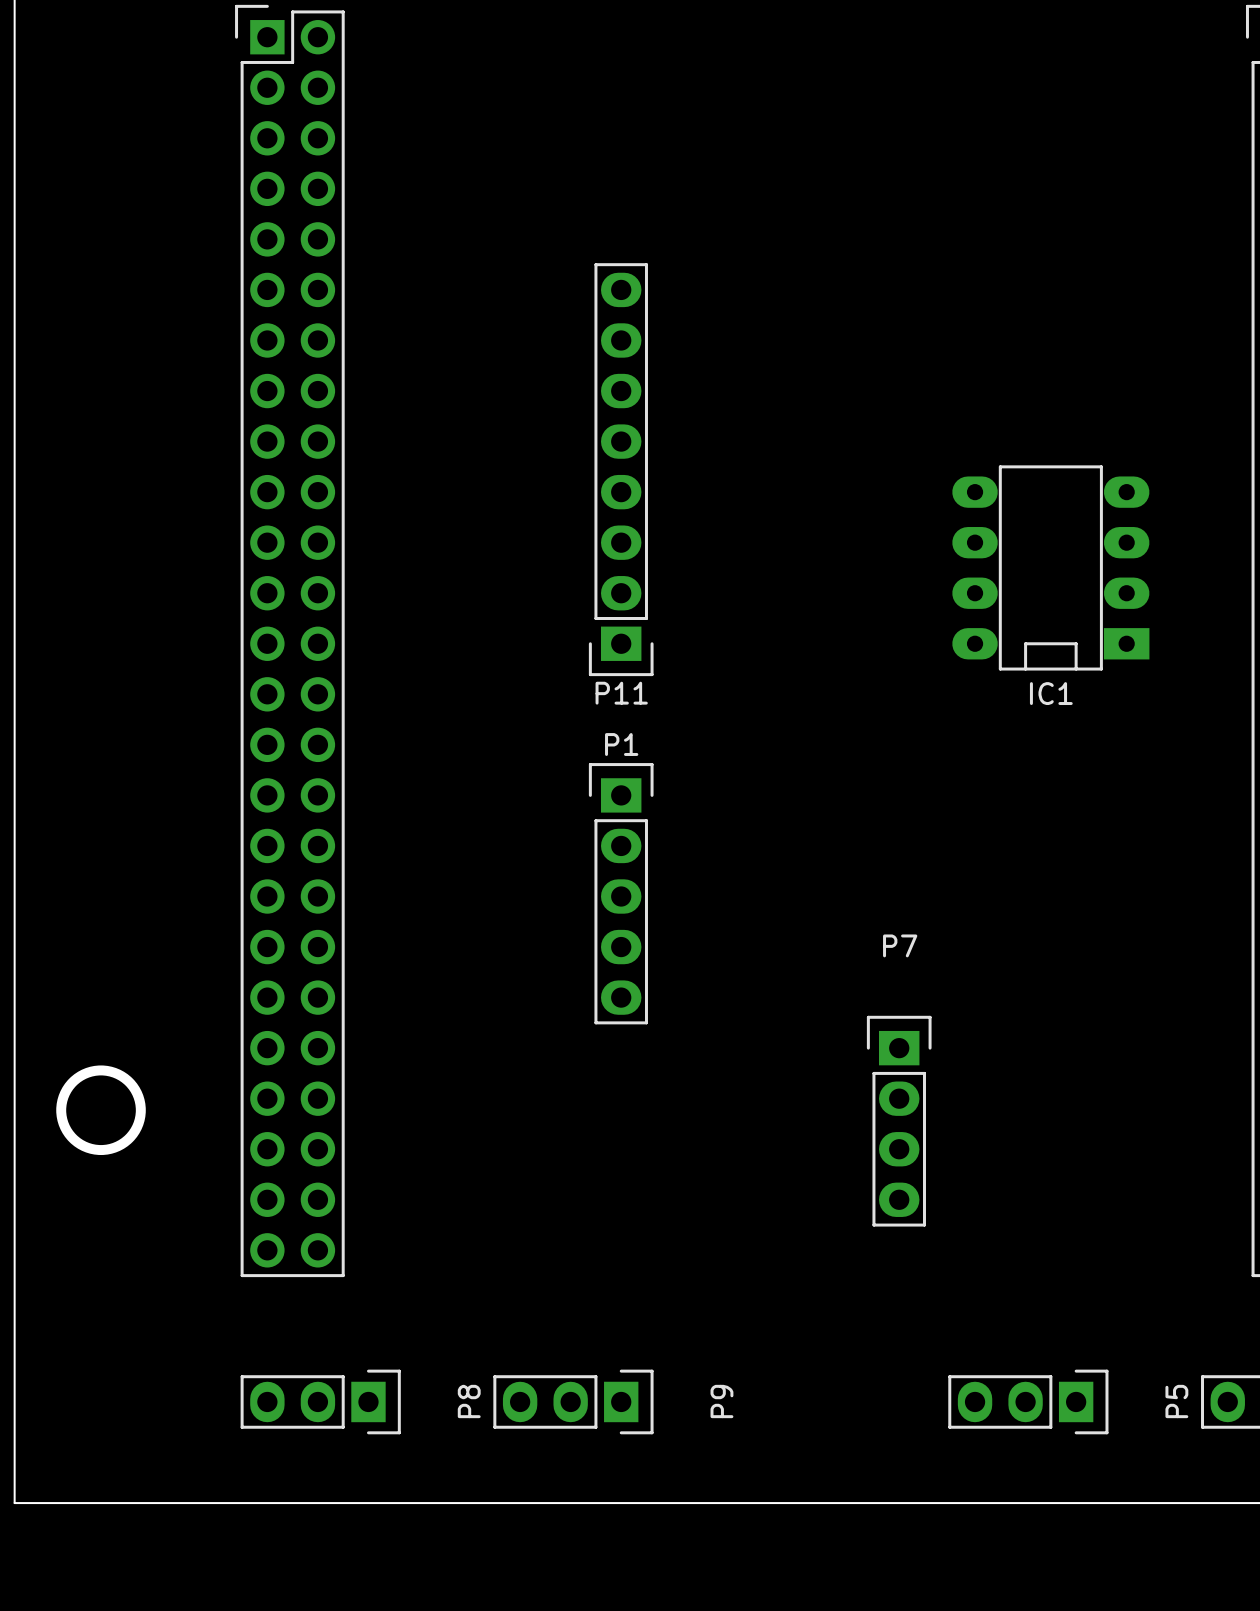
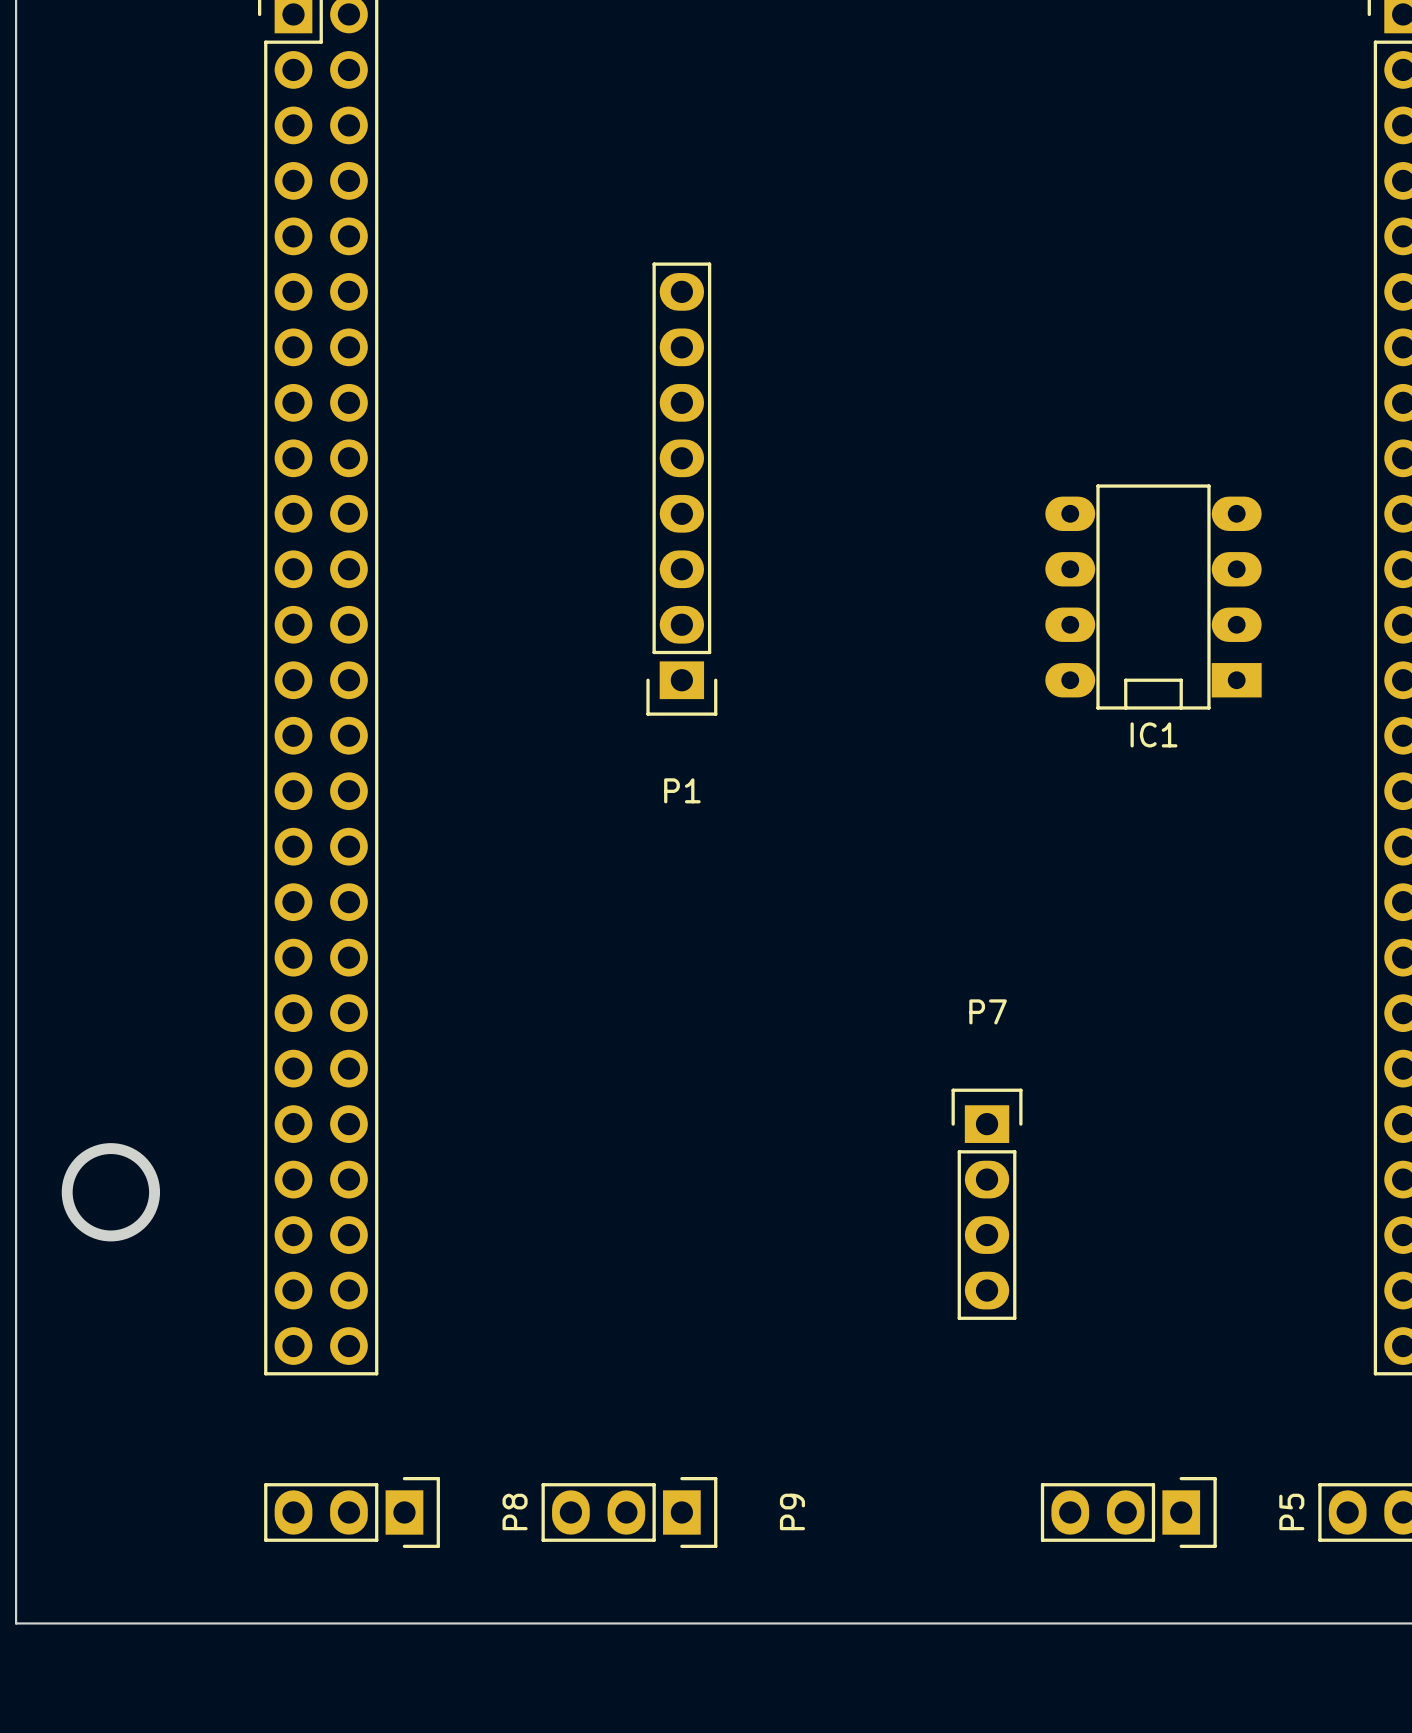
P11: (621, 893) -> none

